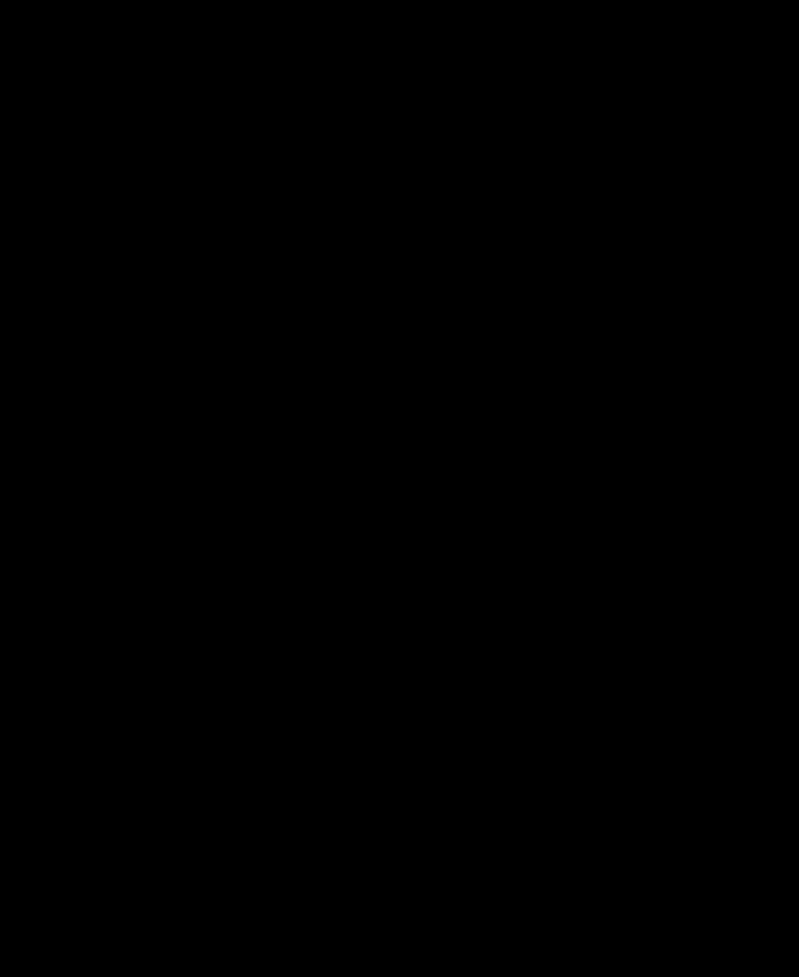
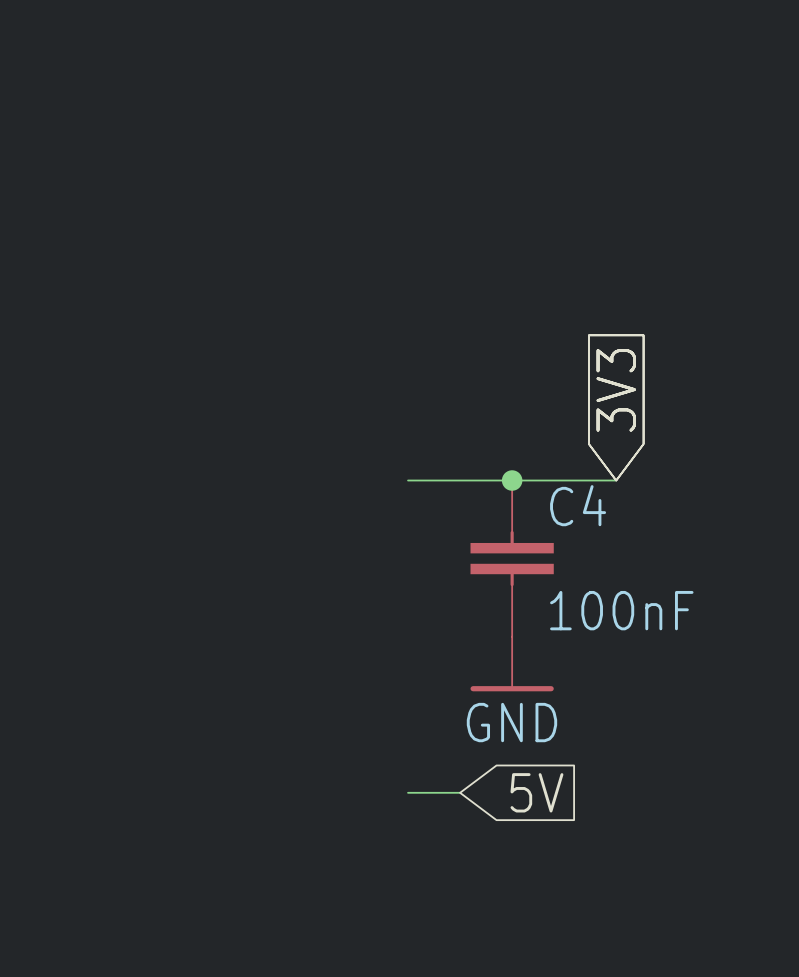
global label: none -> 3V3 (616, 390)
wire: none -> (408, 480) (616, 480)
junction: none -> (512, 480)
C4: none -> 100nF (512, 558)
power symbol: none -> GND (512, 663)
wire: none -> (408, 792) (460, 792)
global label: none -> 5V (536, 792)

